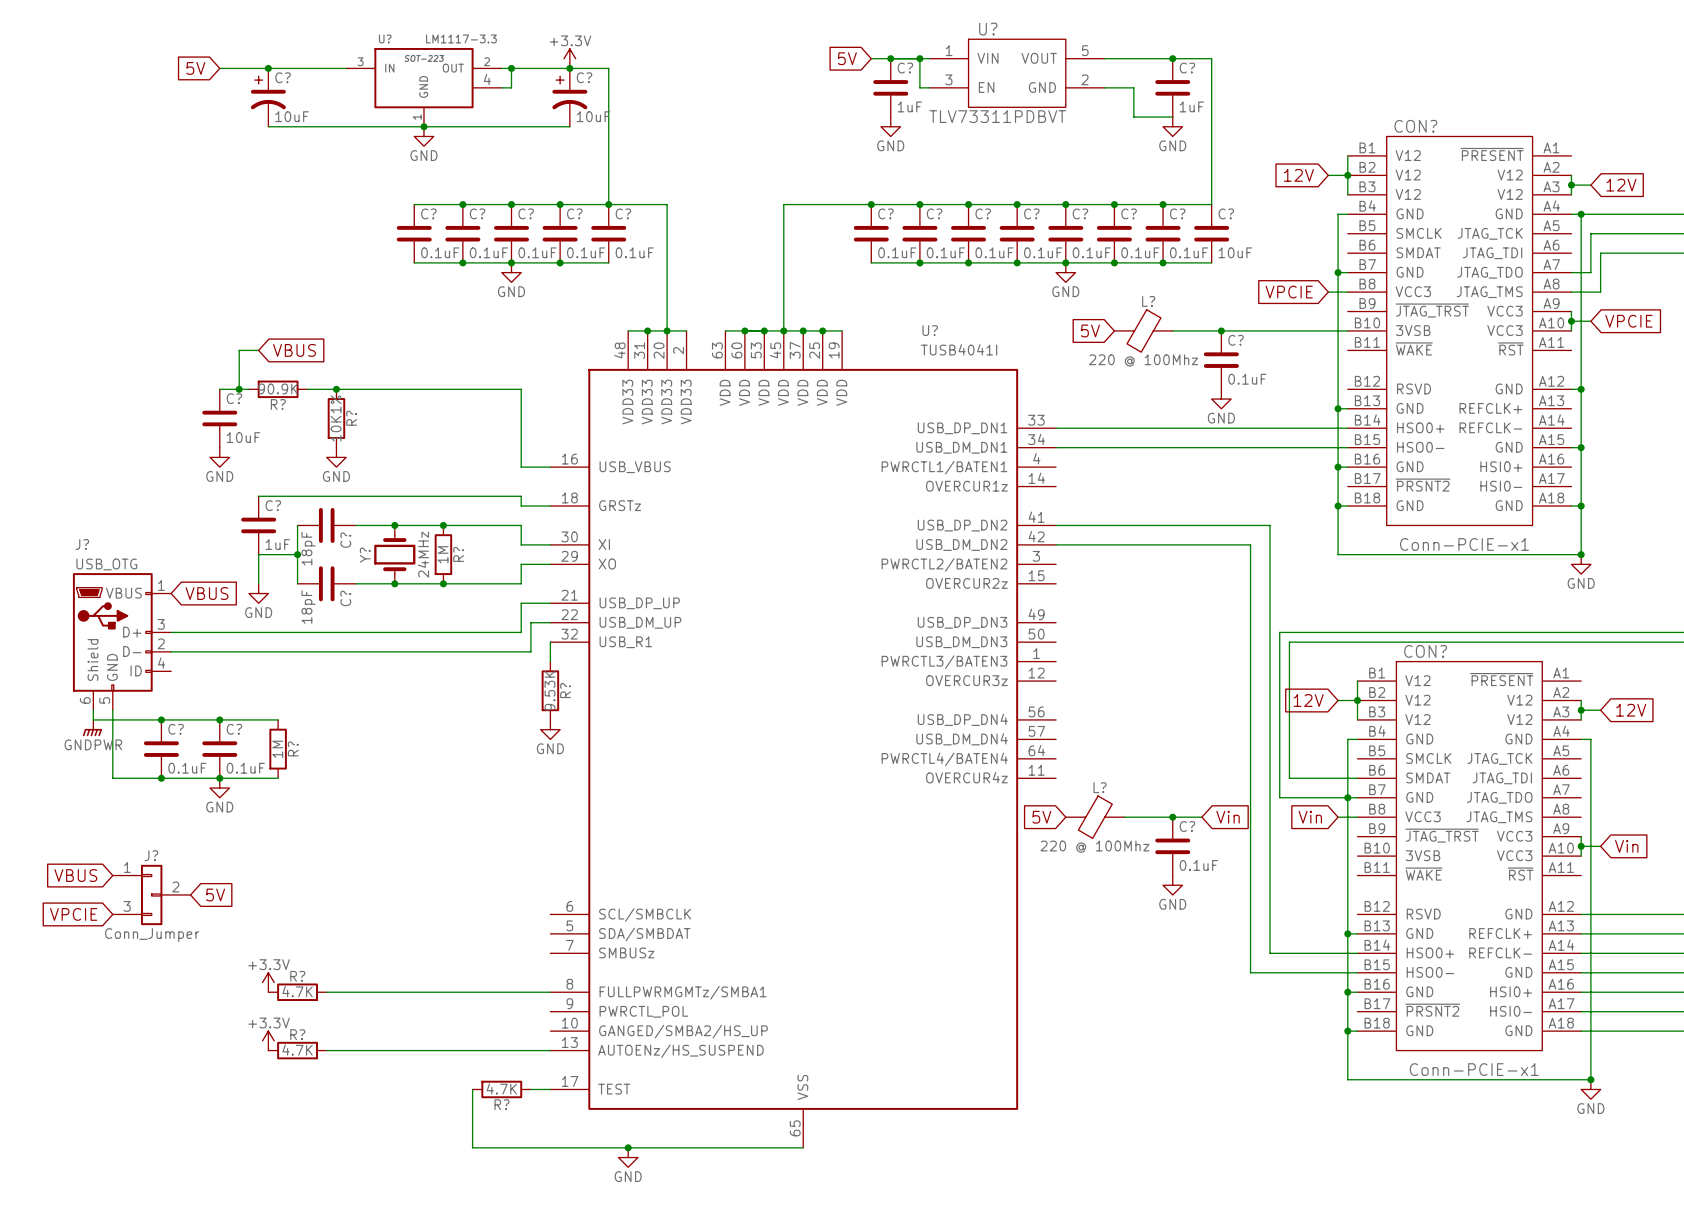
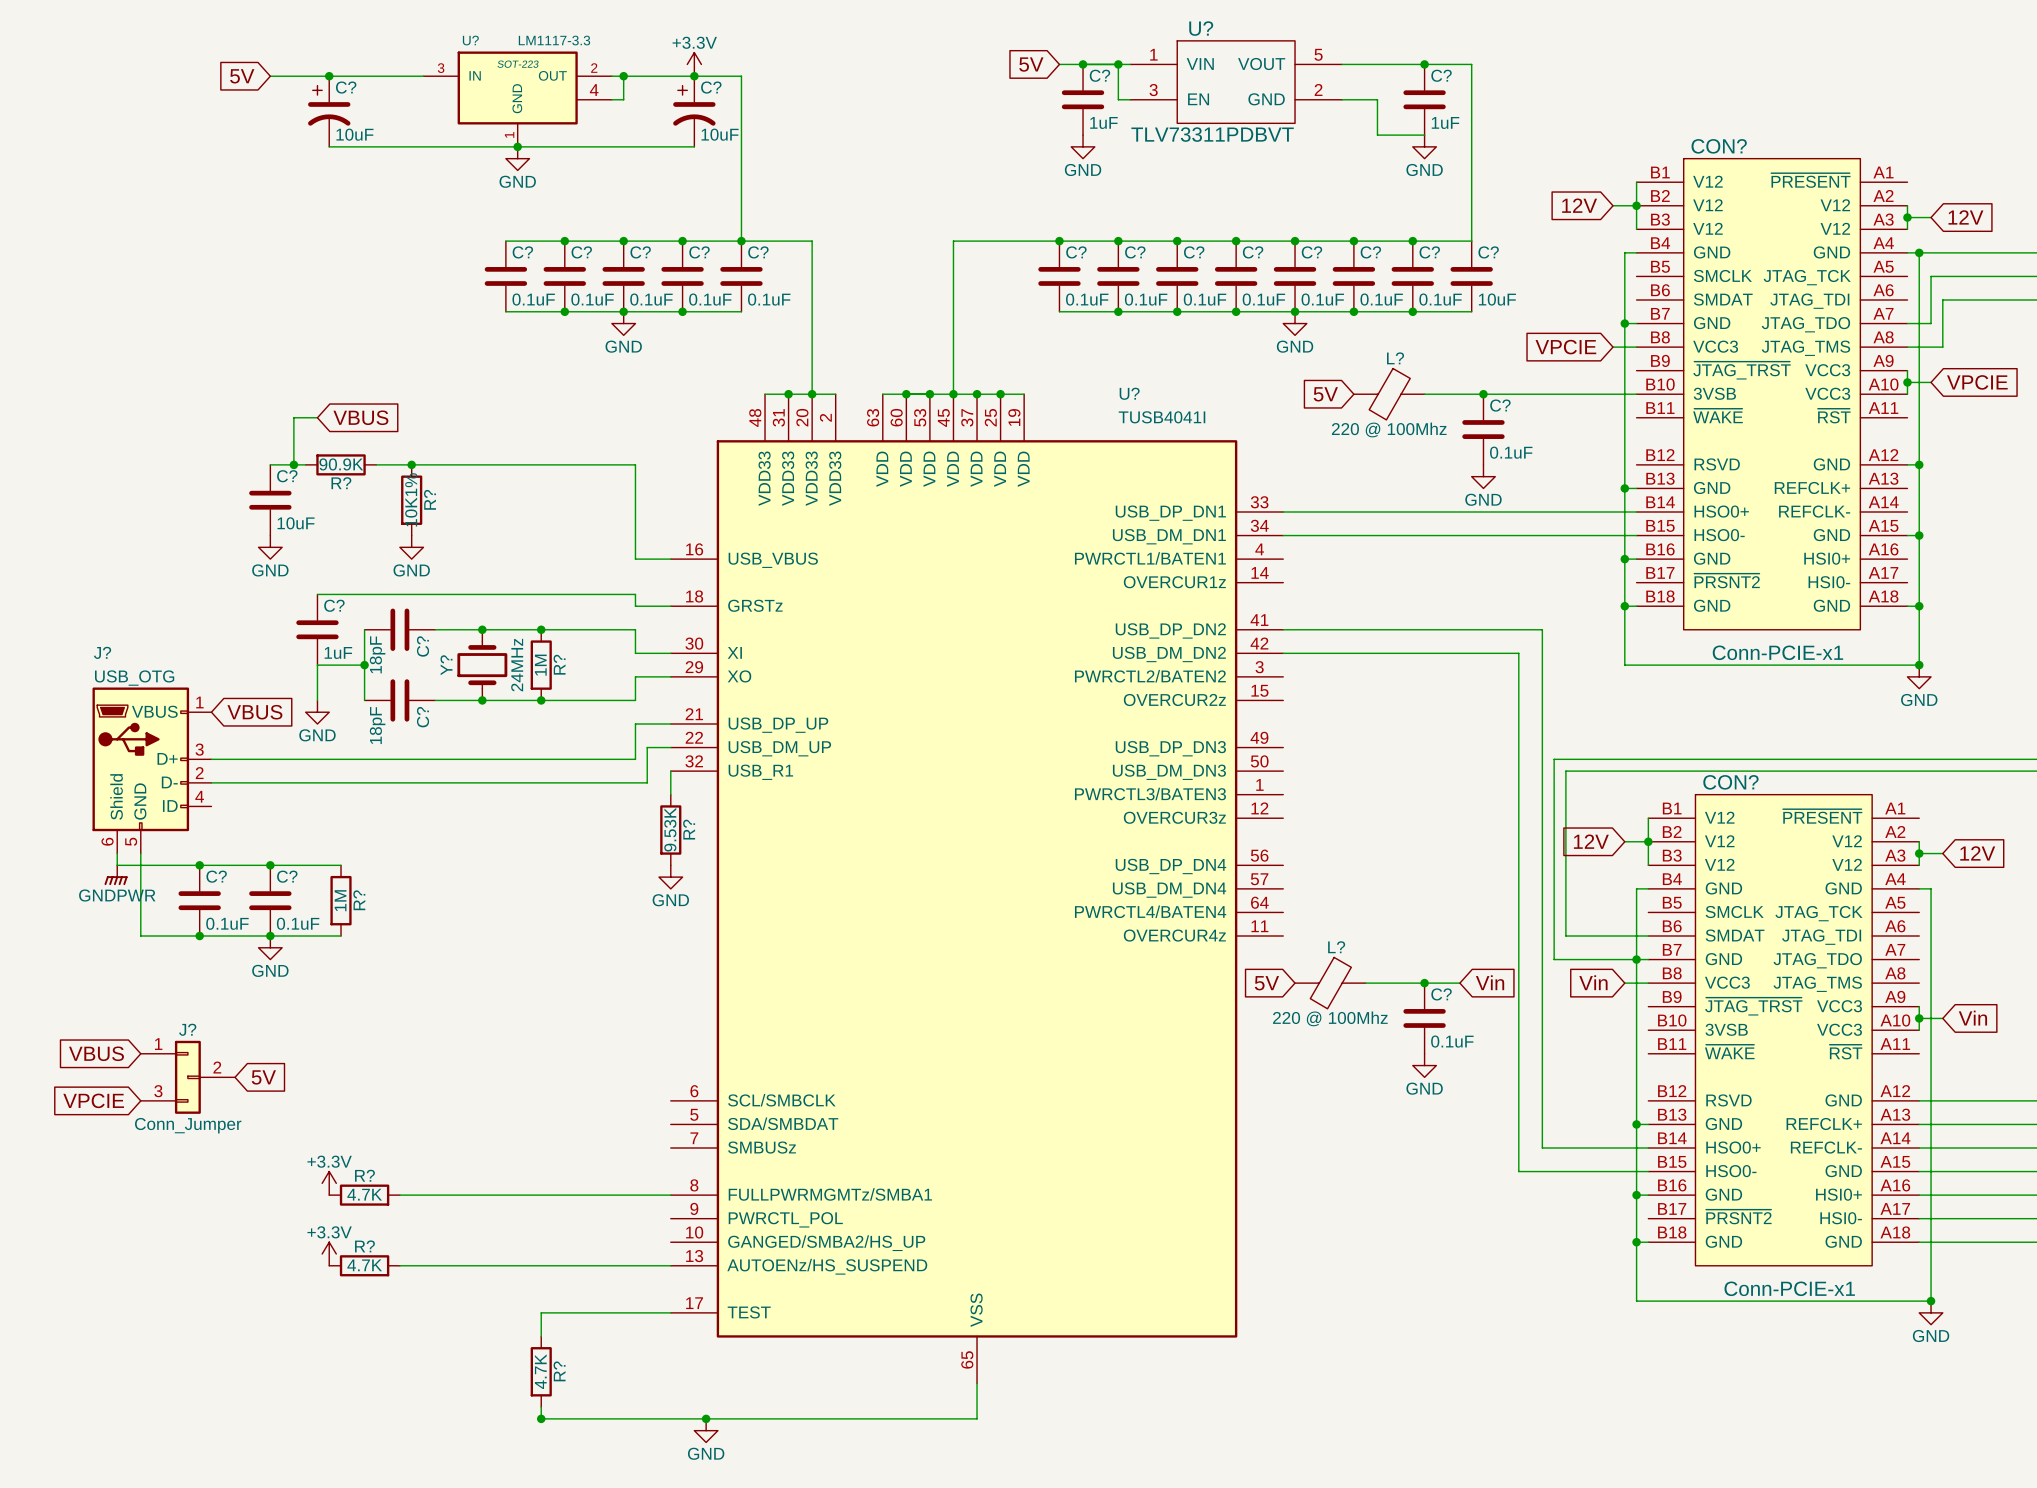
wire: (472, 1089) (472, 1147) (803, 1147) -> (541, 1407) (541, 1418) (977, 1418) (977, 1383)
R? rotation: 0° (501, 1089) -> 90° clockwise (541, 1371)
R? position: (501, 1089) -> (541, 1371)
wire: none -> (647, 1312) (541, 1312) (541, 1336)
R? name position: R? (502, 1104) -> R? (559, 1371)
junction: (628, 1147) -> none
power symbol position: GND (628, 1157) -> GND (706, 1430)
junction: none -> (541, 1418)
junction: none -> (706, 1418)

